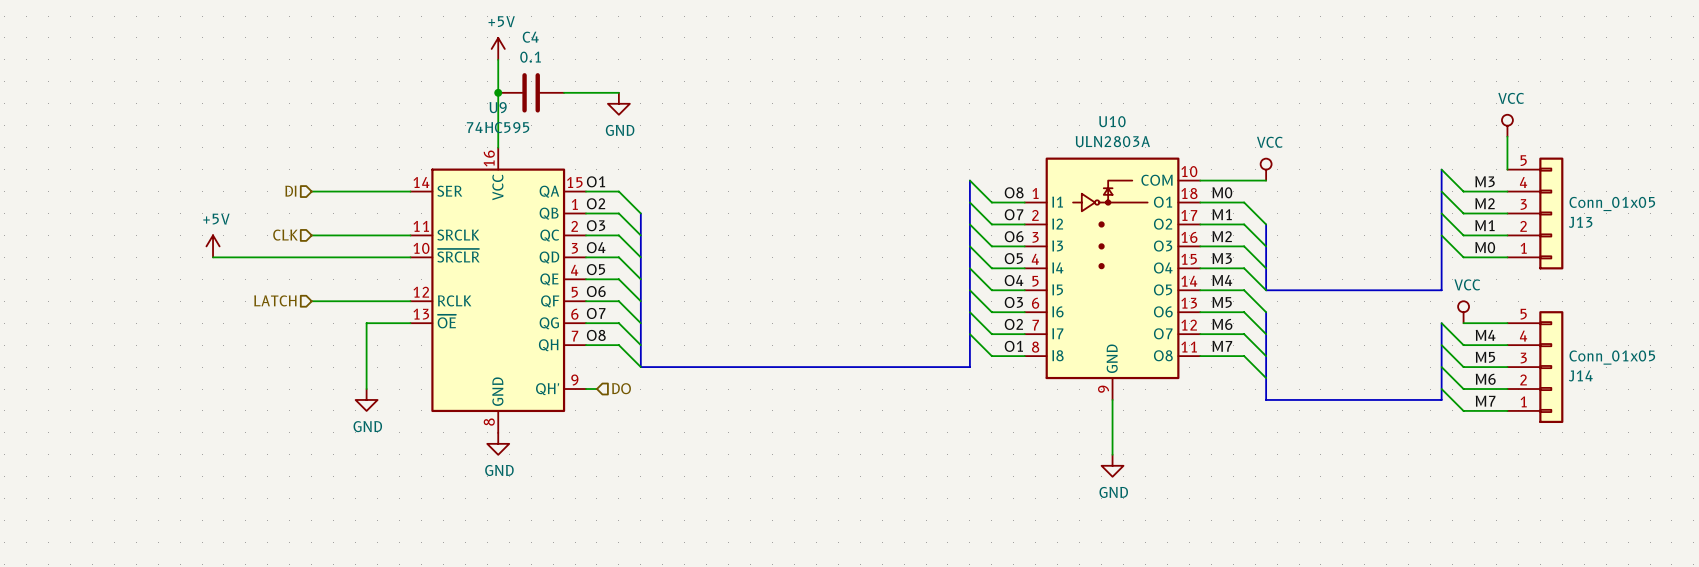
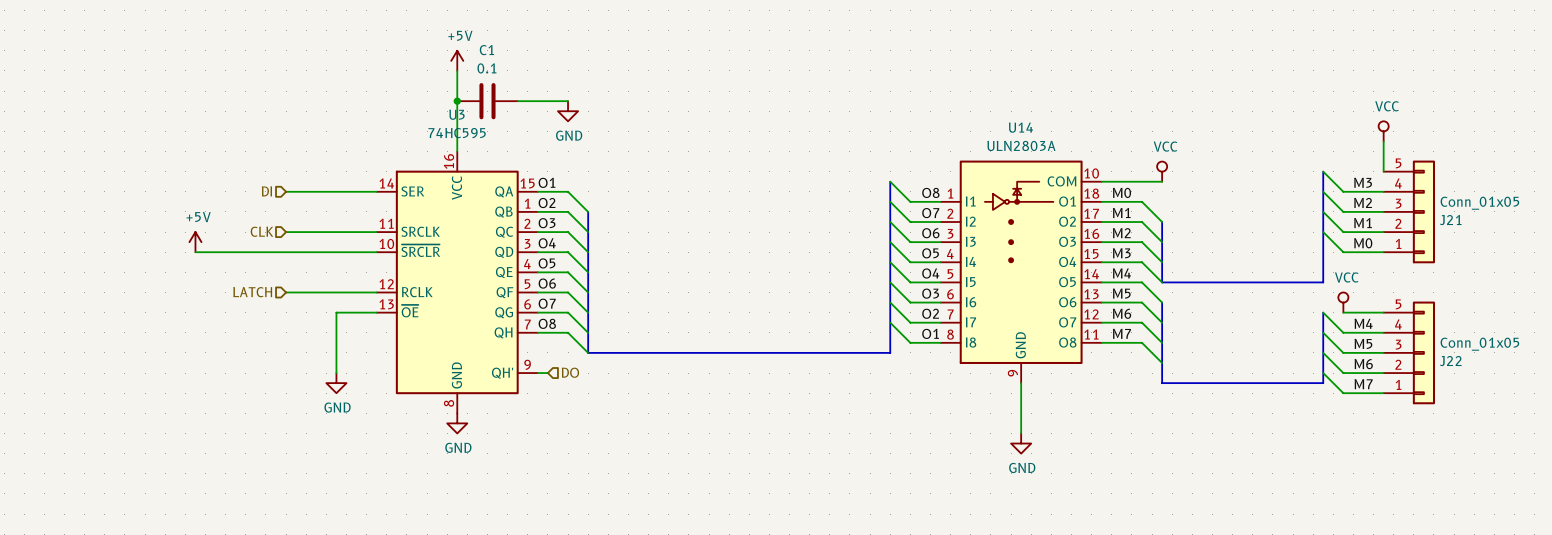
C4 name: C4 (530, 37) -> C1 (486, 50)
U9 name: U9 (498, 107) -> U3 (456, 114)
U10 name: U10 (1112, 121) -> U14 (1020, 127)
J13 name: J13 (1580, 222) -> J21 (1450, 220)
J14 name: J14 (1580, 375) -> J22 (1450, 361)

